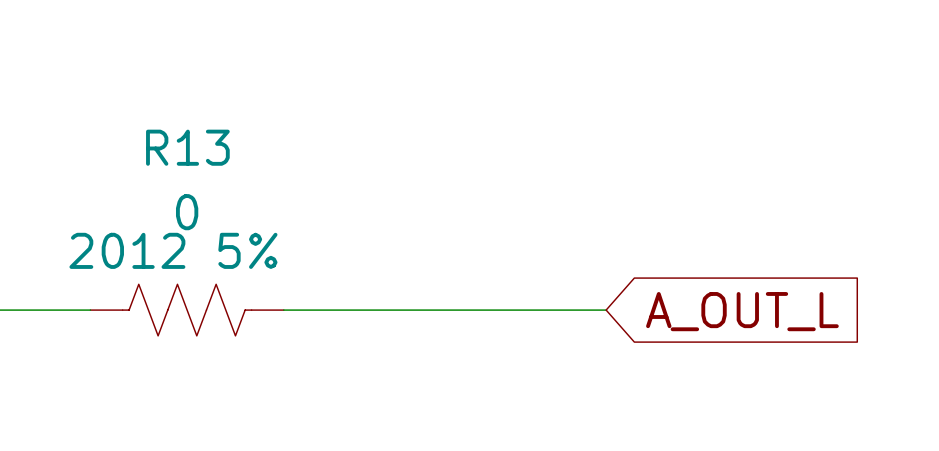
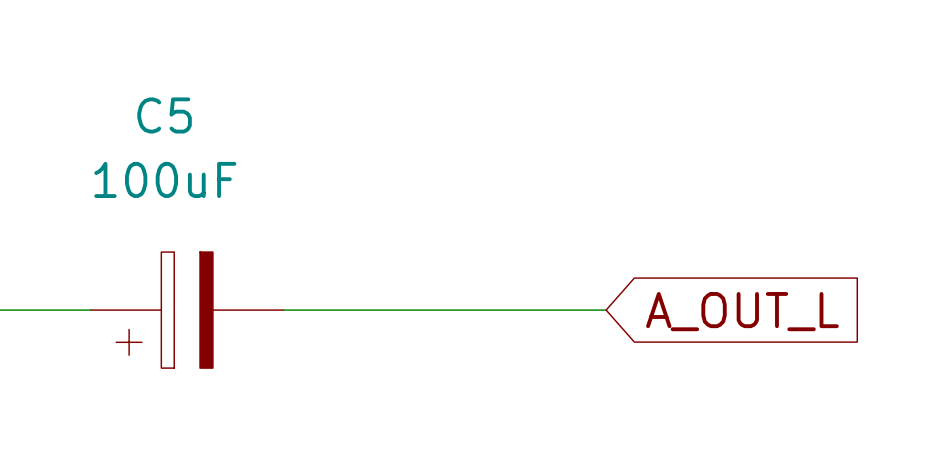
R13: 0 (187, 310) -> none
C5: none -> 100uF (187, 310)

